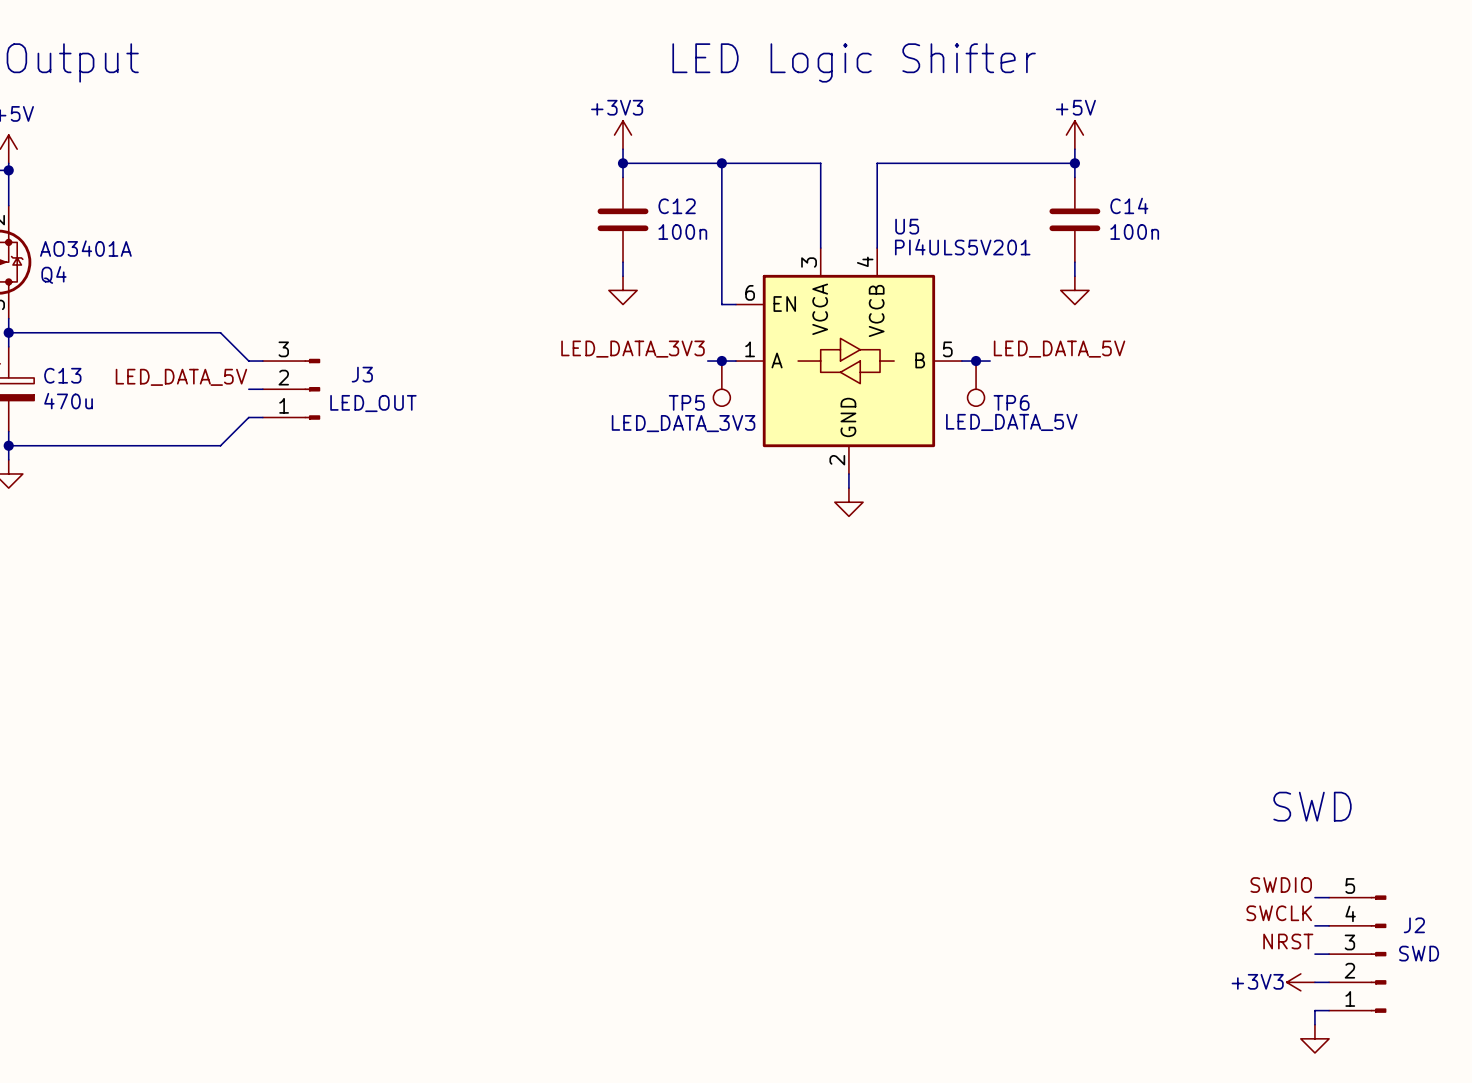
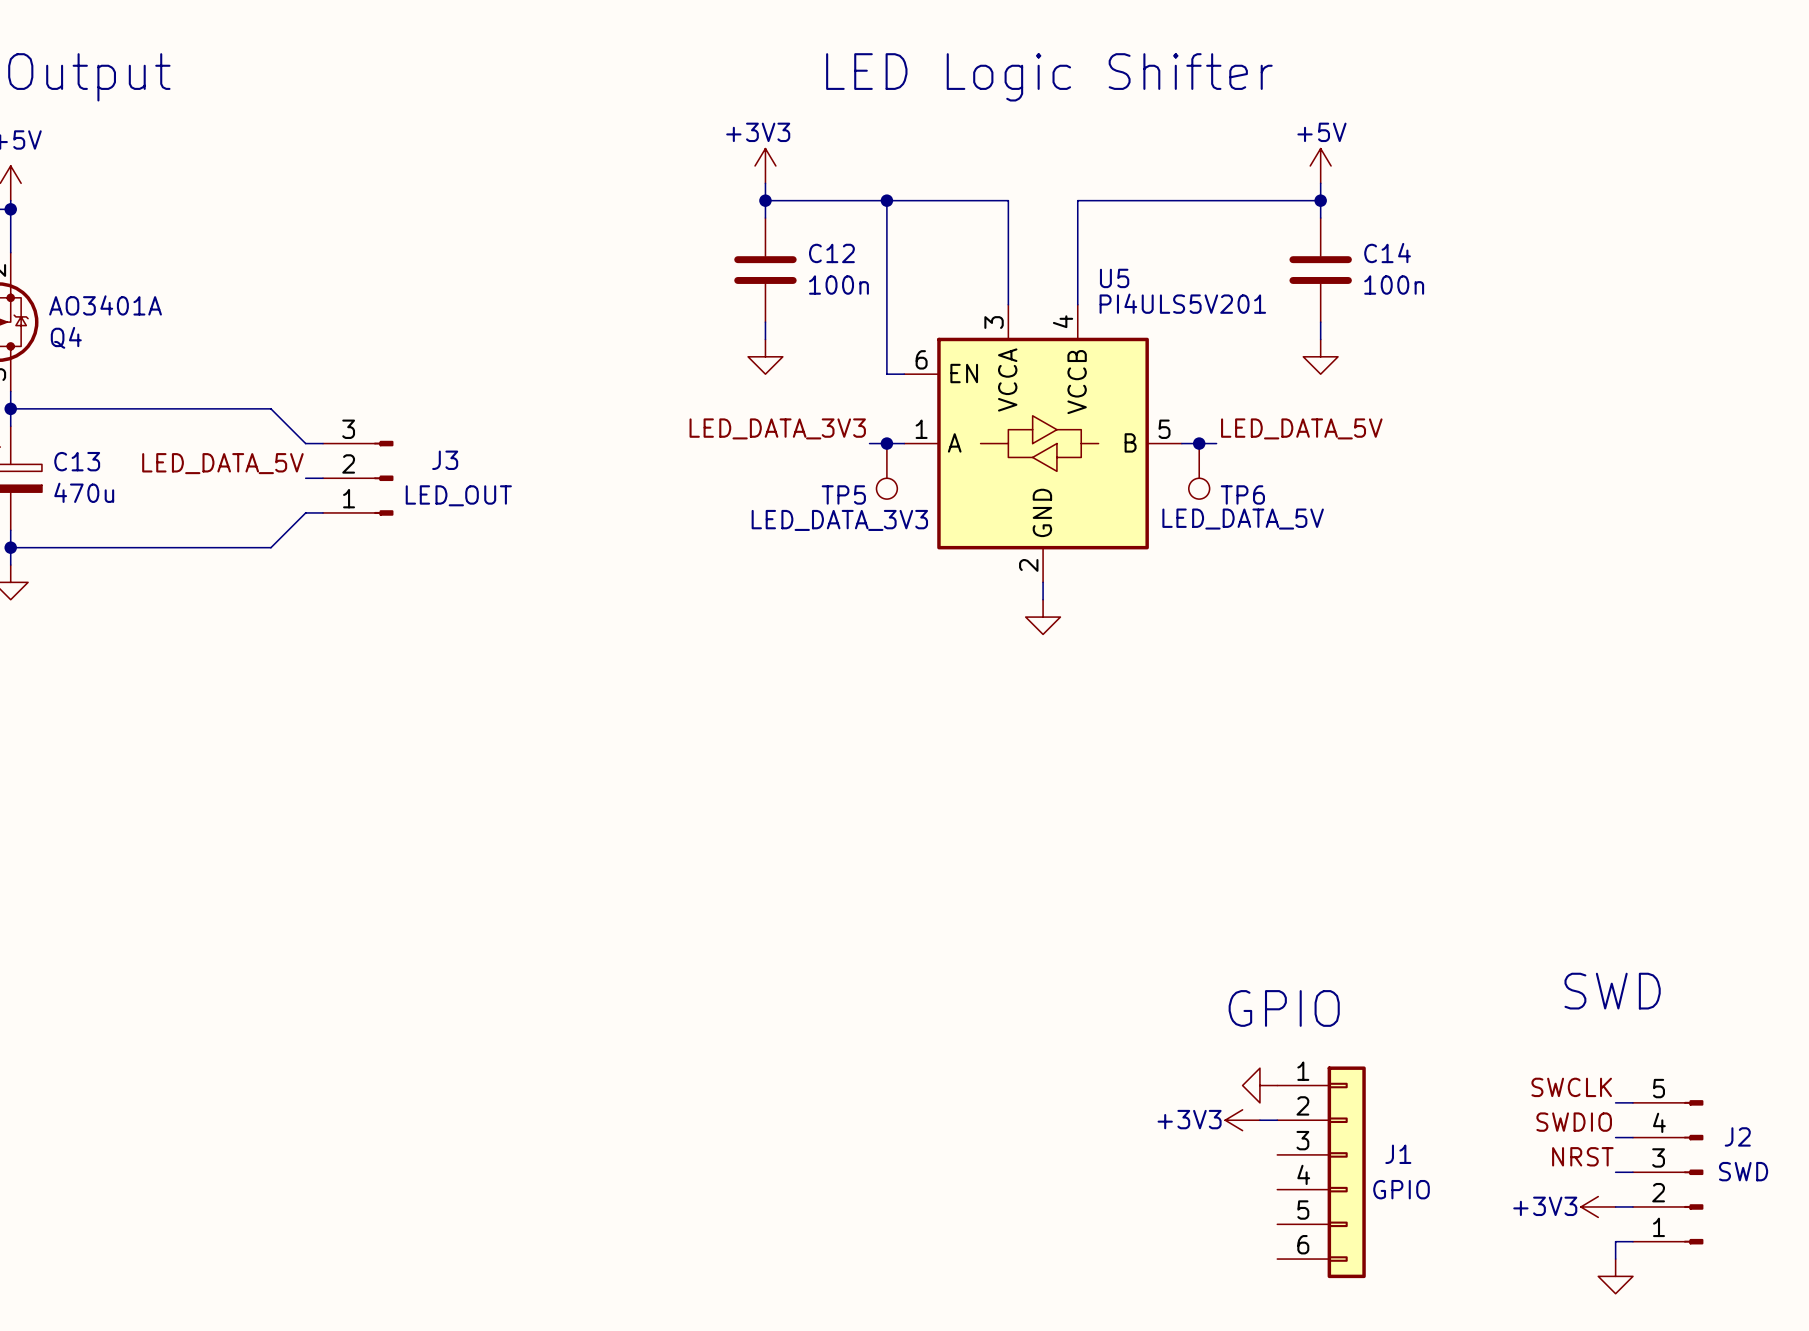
text: none -> GPIO (1284, 1008)
power symbol: none -> (1259, 1085)
label: SWDIO (1281, 885) -> SWCLK (1571, 1087)
power symbol: none -> +3V3 (1242, 1120)
wire: none -> (1259, 1120) (1277, 1120)
label: SWCLK (1279, 913) -> SWDIO (1574, 1122)
J1: none -> GPIO (1321, 1172)

